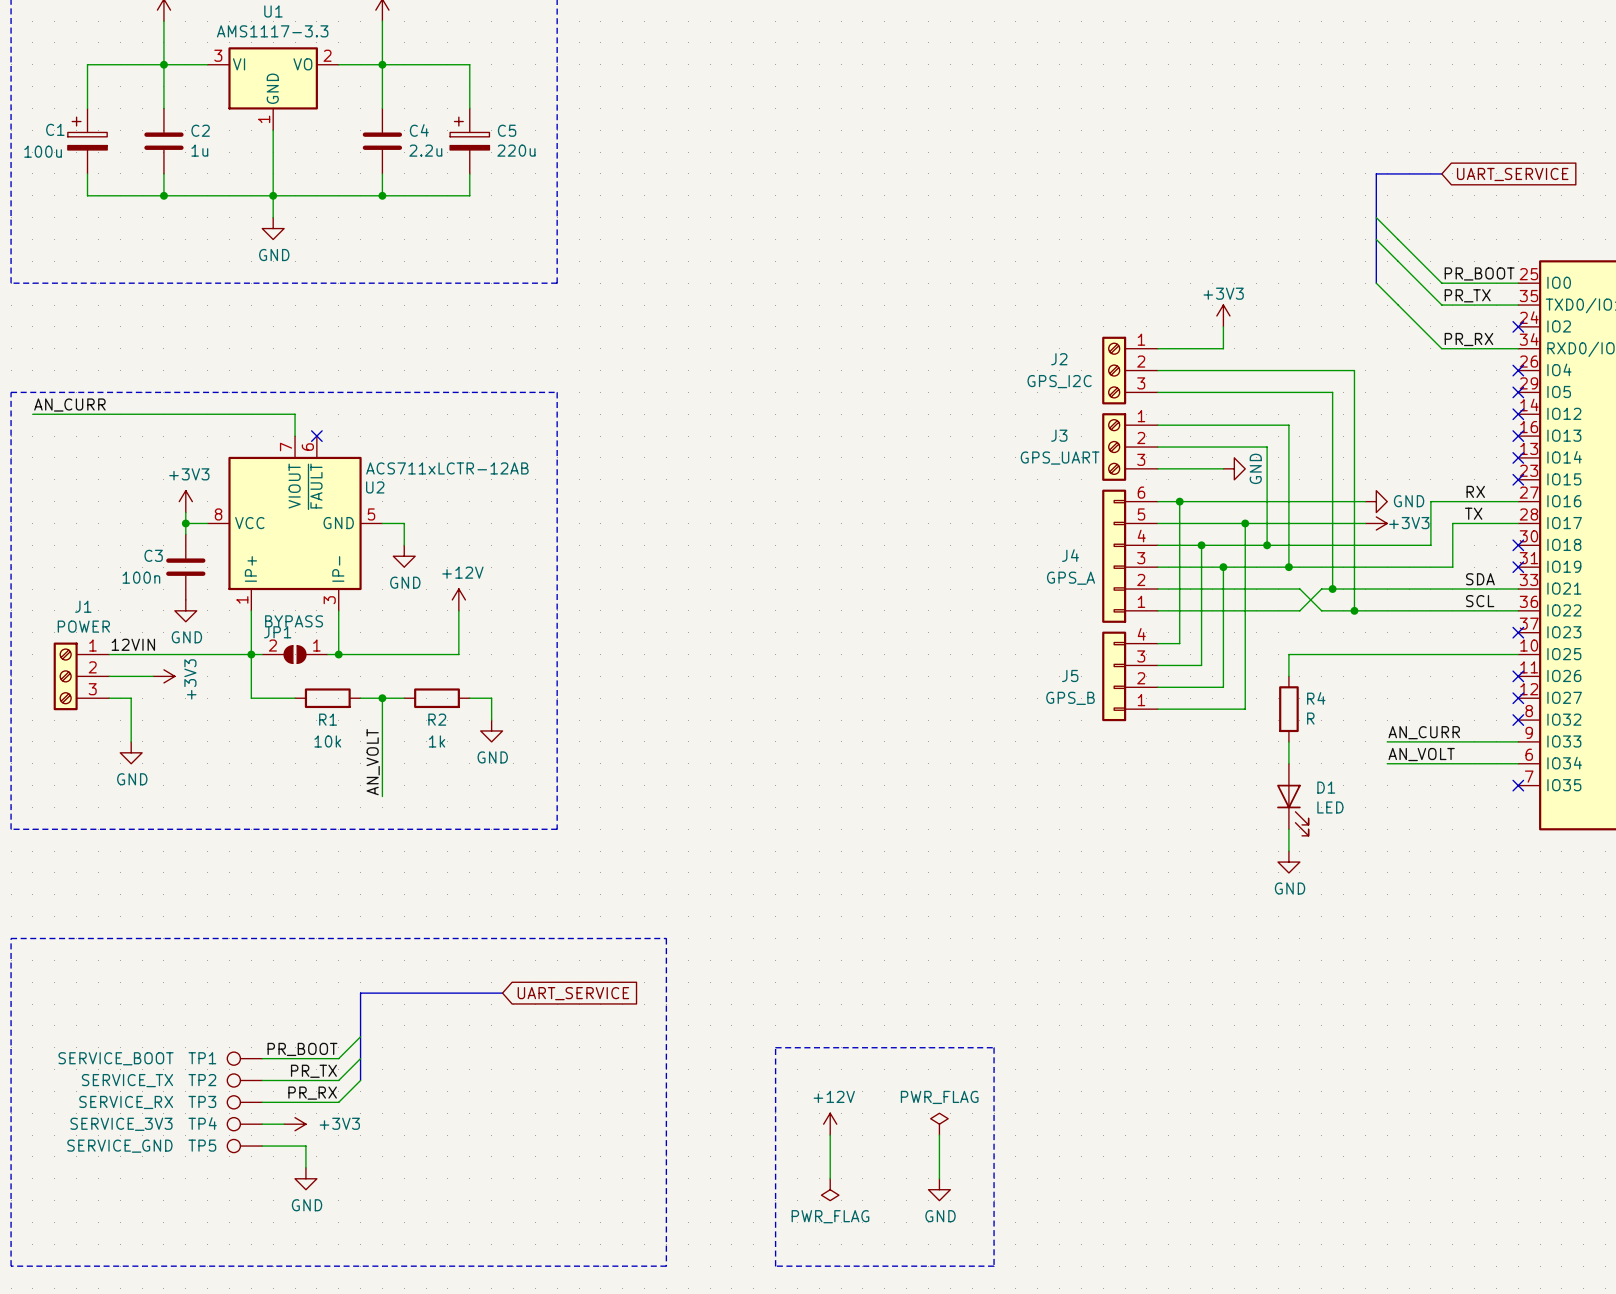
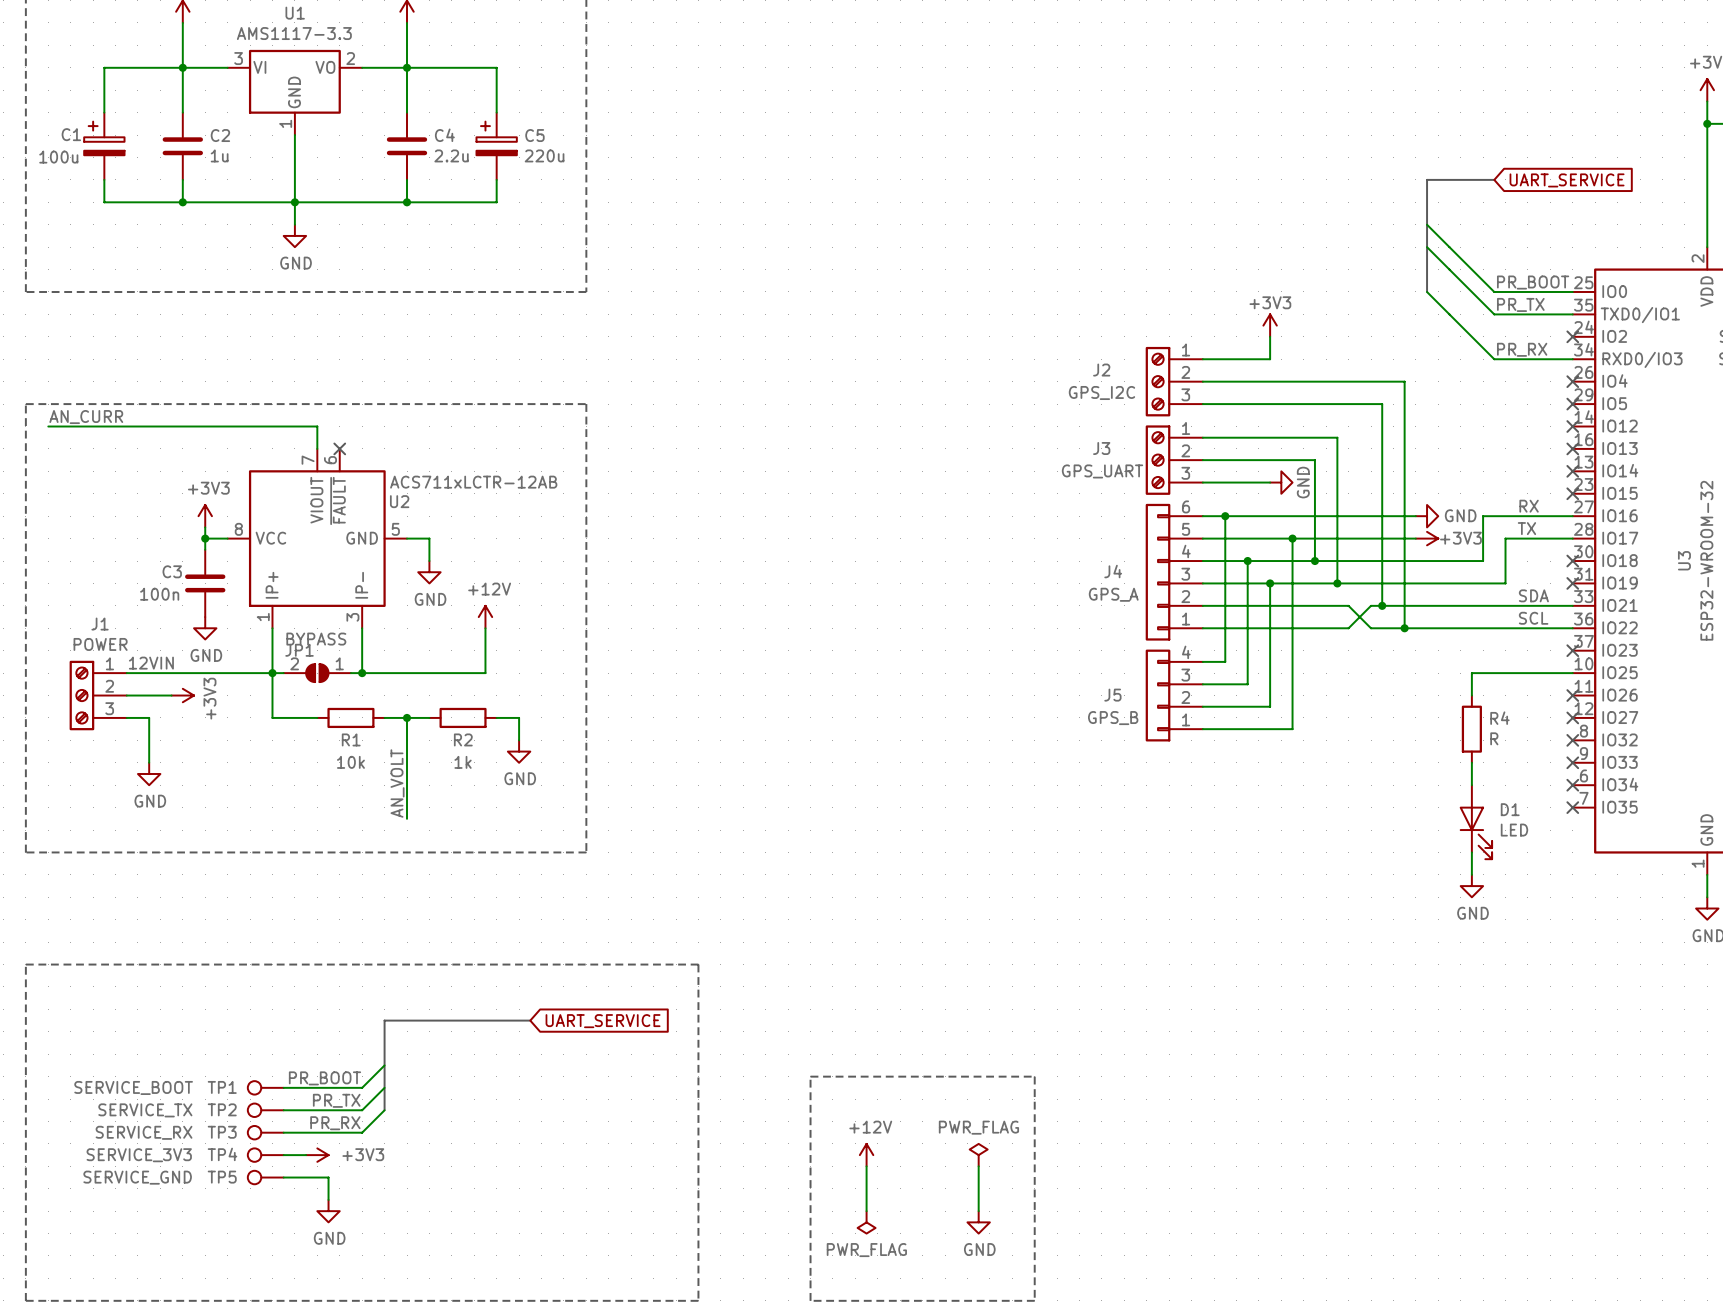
wire: (1420, 654) (1288, 654) (1288, 676) -> (1471, 673) (1471, 695)
R4 position: (1288, 709) -> (1471, 729)
label: AN_CURR (1424, 732) -> none
wire: (1288, 741) (1288, 763) -> (1471, 762) (1471, 785)
wire: (1387, 741) (1518, 741) -> none
no-connect mark: none -> (1572, 762)
label: AN_VOLT (1421, 754) -> none
wire: (1387, 763) (1518, 763) -> none
no-connect mark: none -> (1572, 785)
D1 position: (1292, 799) -> (1475, 822)
wire: (1288, 829) (1288, 851) -> (1471, 852) (1471, 874)
power symbol position: GND (1288, 862) -> GND (1471, 886)

